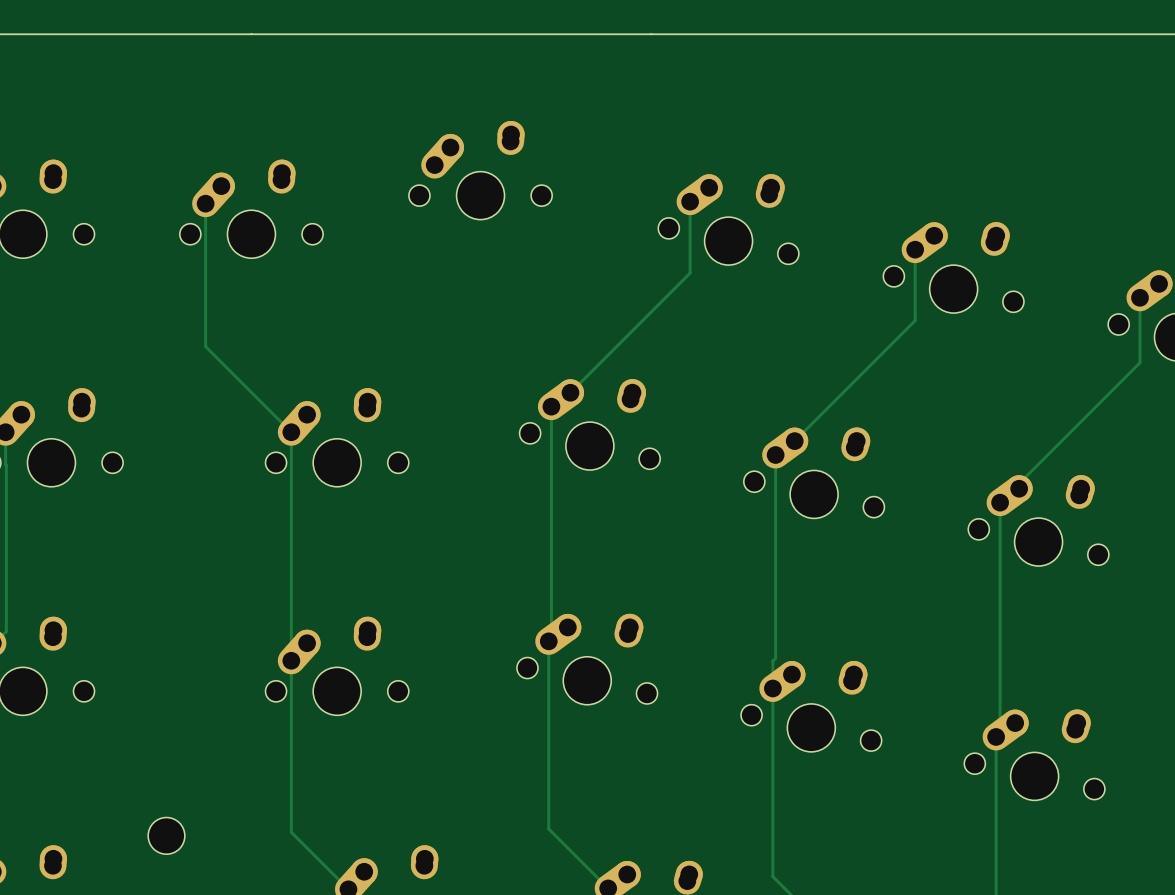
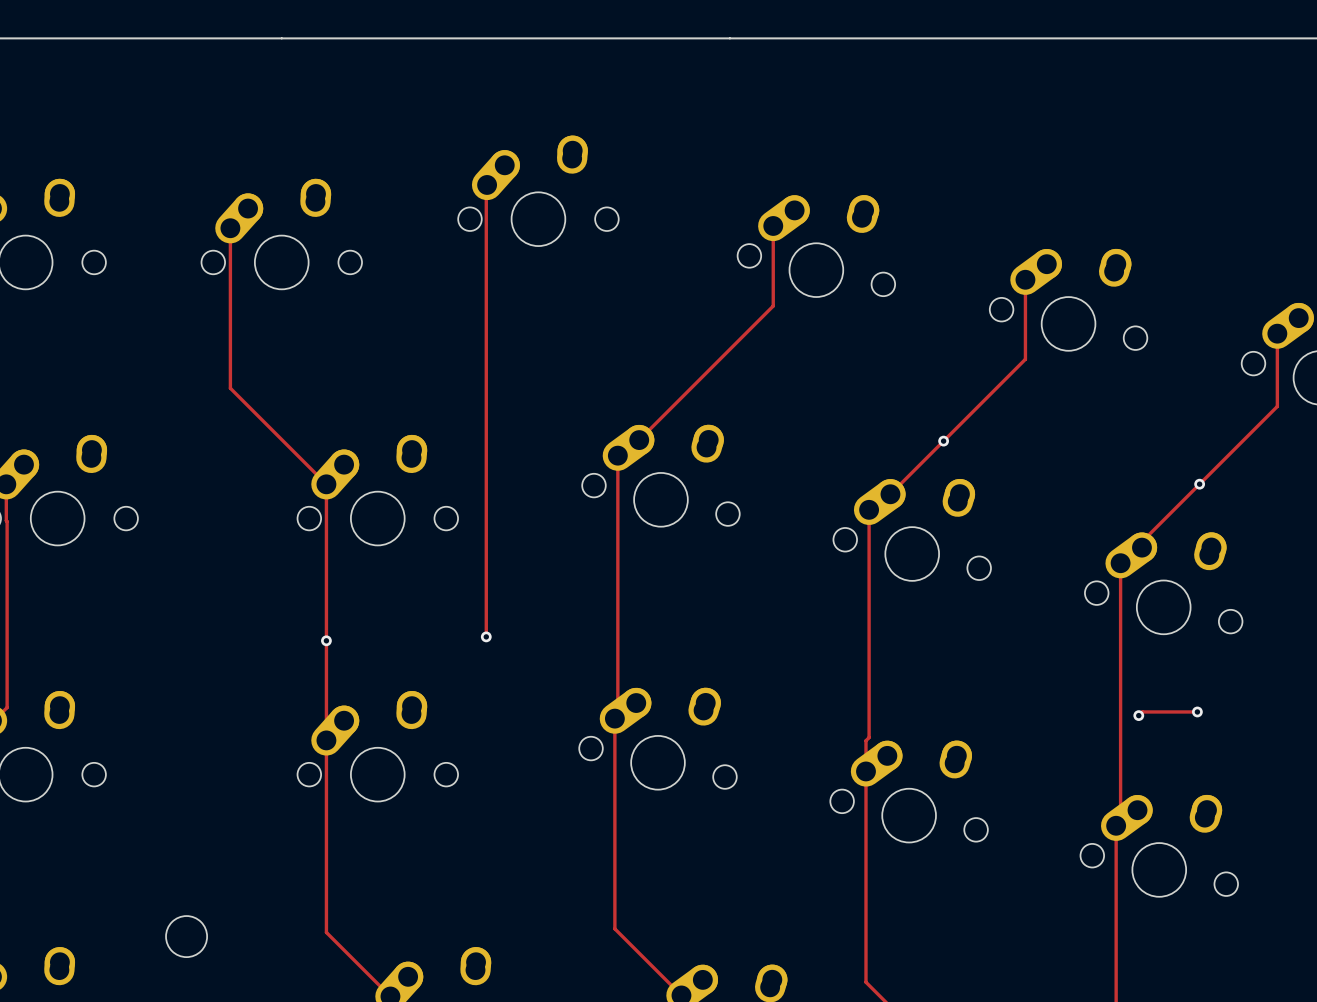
track: none -> (487, 184) (486, 636)
via: none -> (943, 441)
via: none -> (1199, 484)
via: none -> (486, 636)
via: none -> (326, 640)
track: none -> (1197, 711) (1142, 711) (1138, 715)
via: none -> (1197, 711)
via: none -> (1138, 715)

